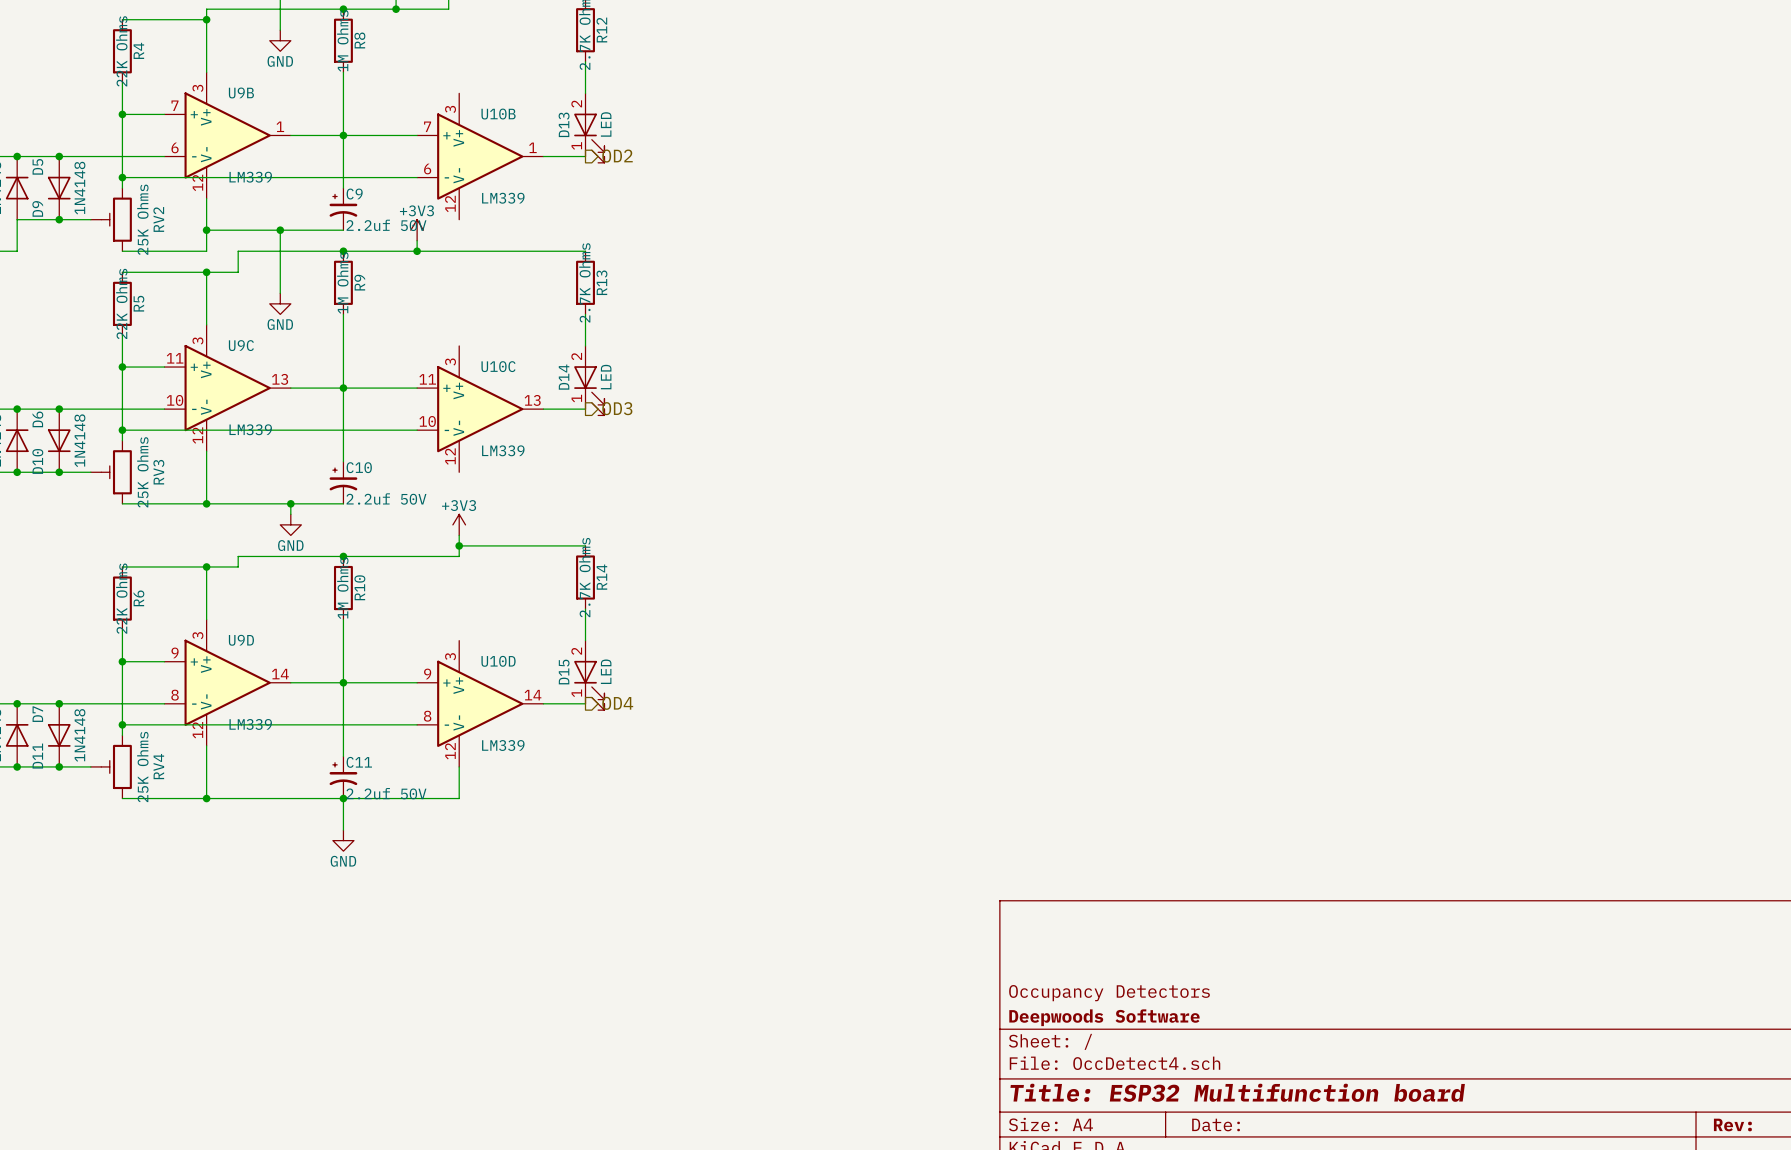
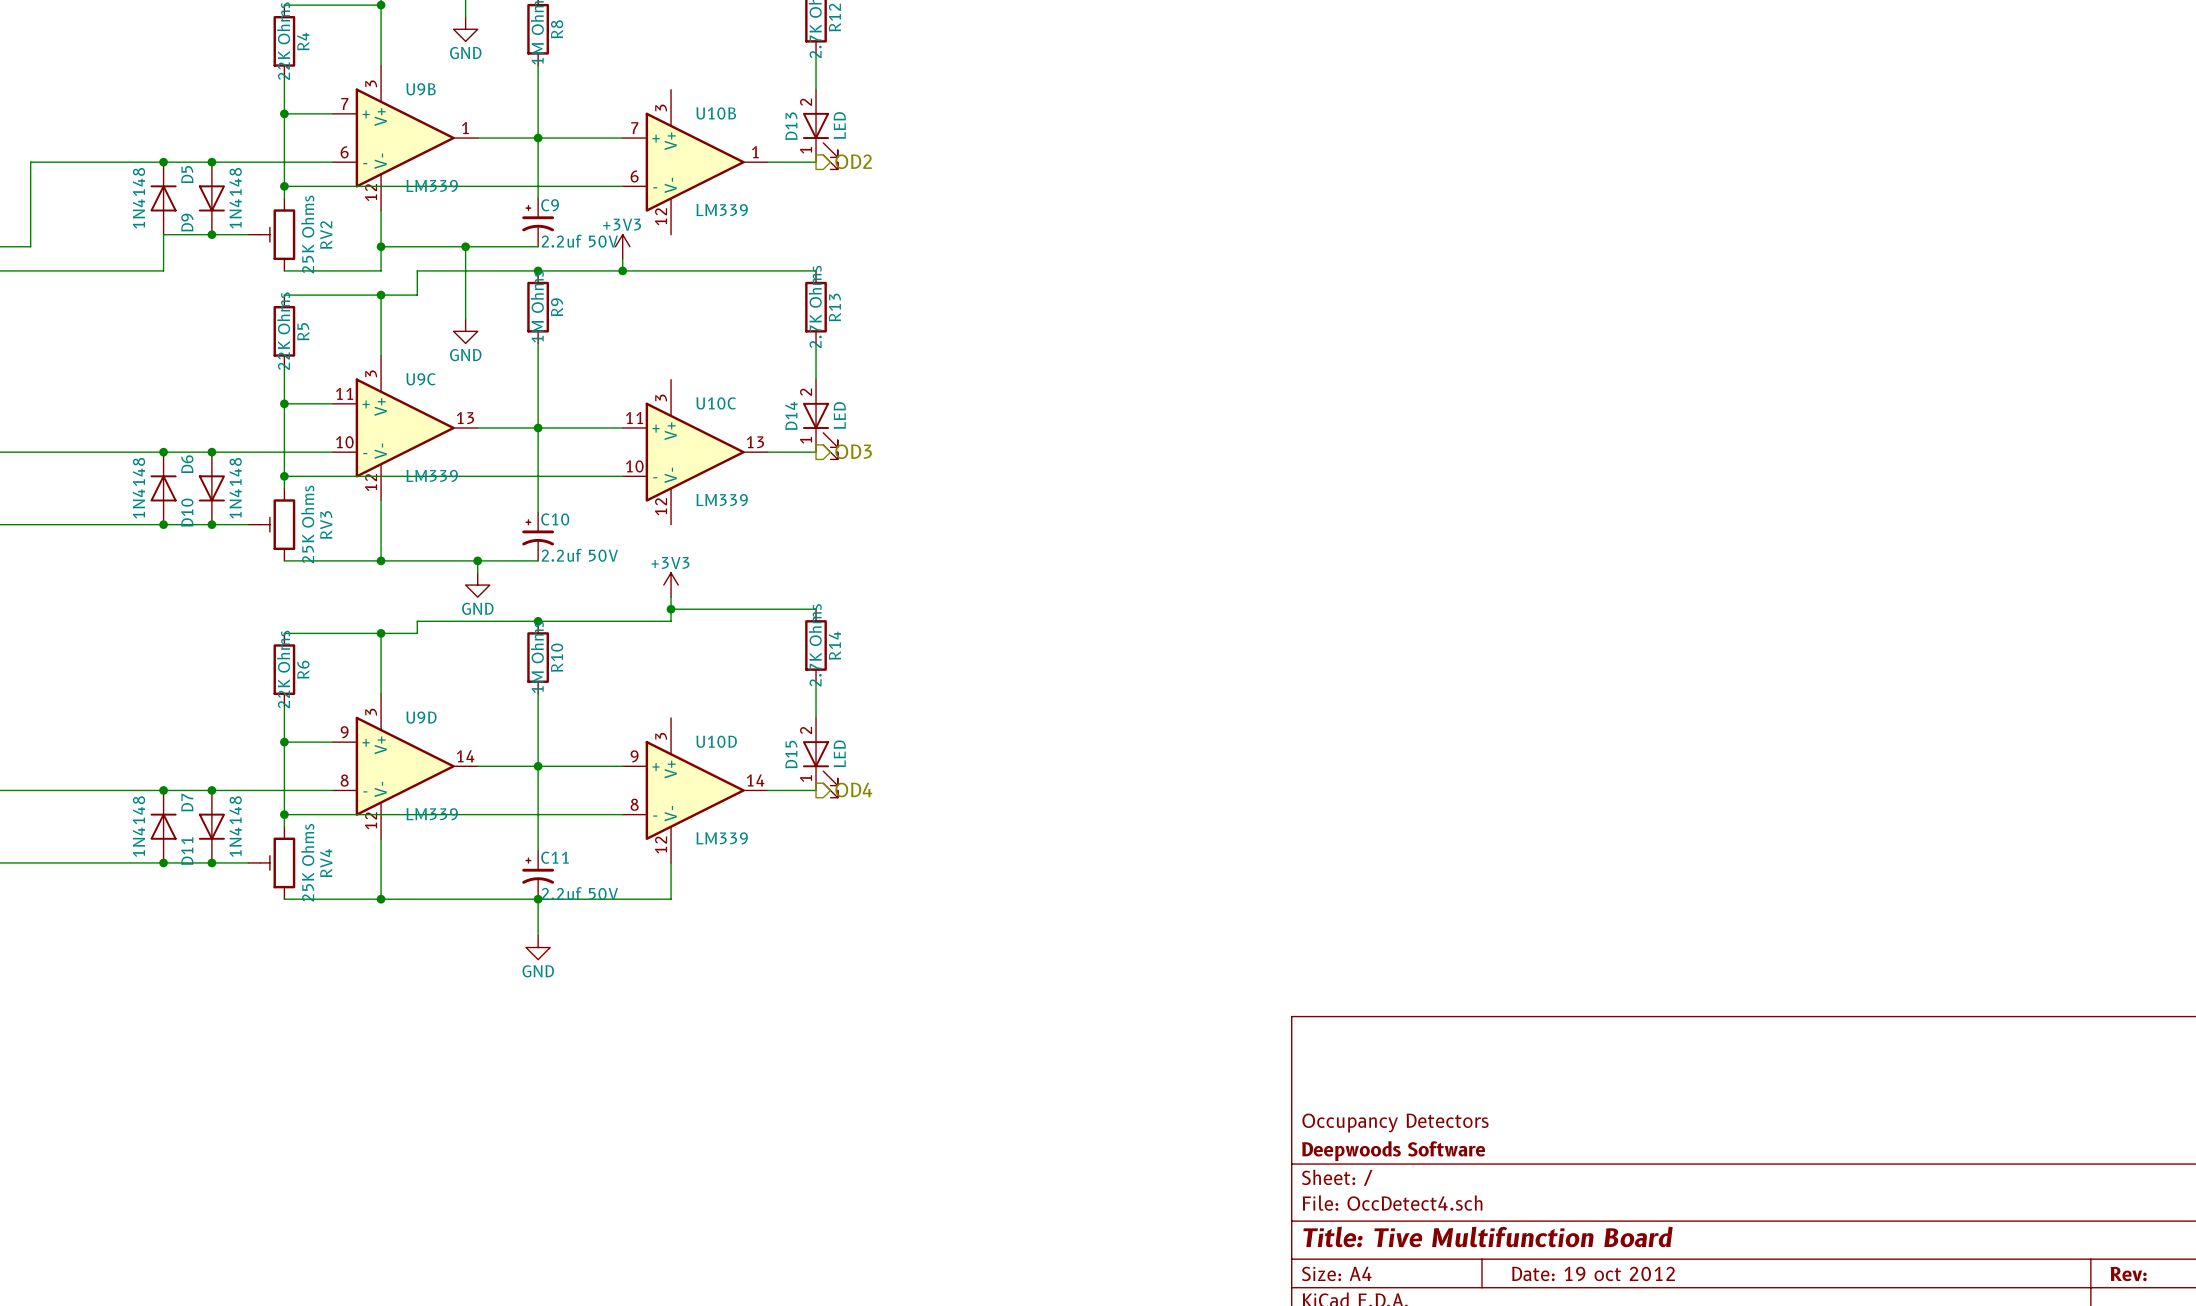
title block: Title: ESP32 Multifunction board (1237, 1092) -> Title: Tive Multifunction Board (1488, 1237)
title block: Date: (1216, 1125) -> Date: 19 oct 2012 (1593, 1273)

